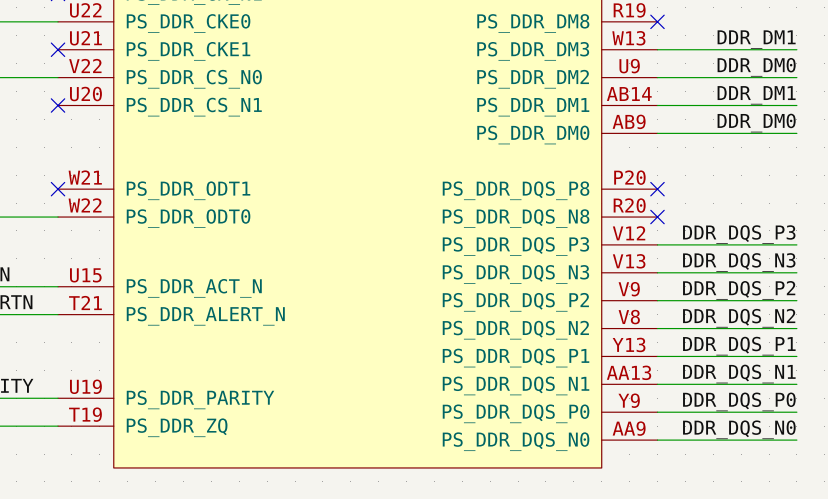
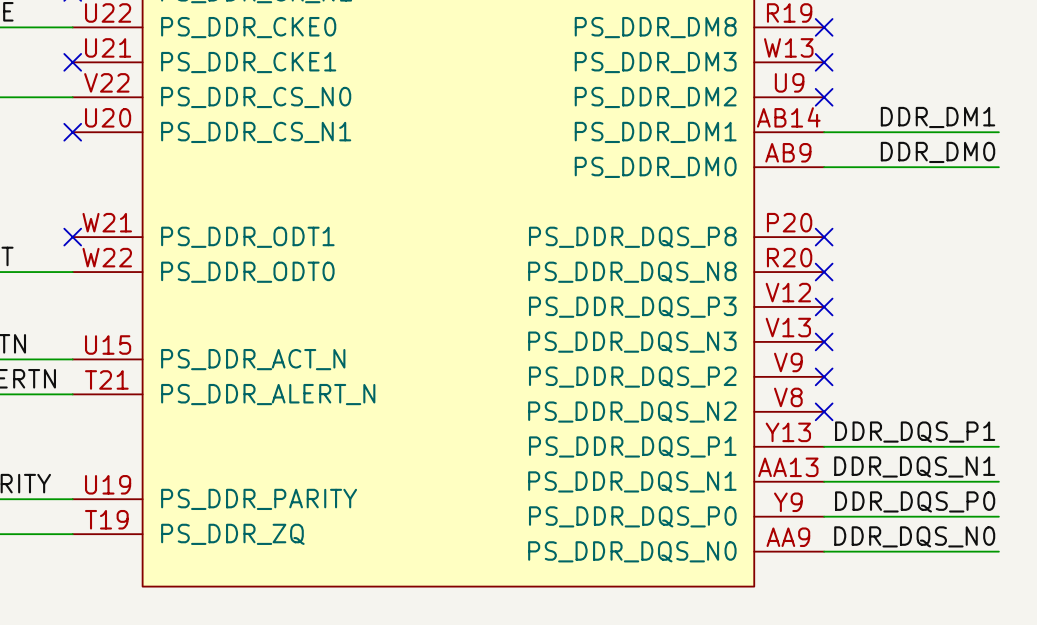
label: DDR_DM1 (756, 39) -> none
wire: (657, 49) (796, 49) -> none
no-connect mark: none -> (824, 62)
label: DDR_DM0 (756, 67) -> none
wire: (657, 77) (796, 77) -> none
no-connect mark: none -> (824, 97)
label: DDR_DQS_P3 (739, 234) -> none
wire: (657, 244) (796, 244) -> none
no-connect mark: none -> (824, 306)
label: DDR_DQS_N3 (739, 262) -> none
wire: (657, 272) (796, 272) -> none
no-connect mark: none -> (824, 341)
label: DDR_DQS_P2 (739, 290) -> none
wire: (657, 300) (796, 300) -> none
no-connect mark: none -> (824, 376)
label: DDR_DQS_N2 (739, 318) -> none
wire: (657, 328) (796, 328) -> none
no-connect mark: none -> (824, 411)

